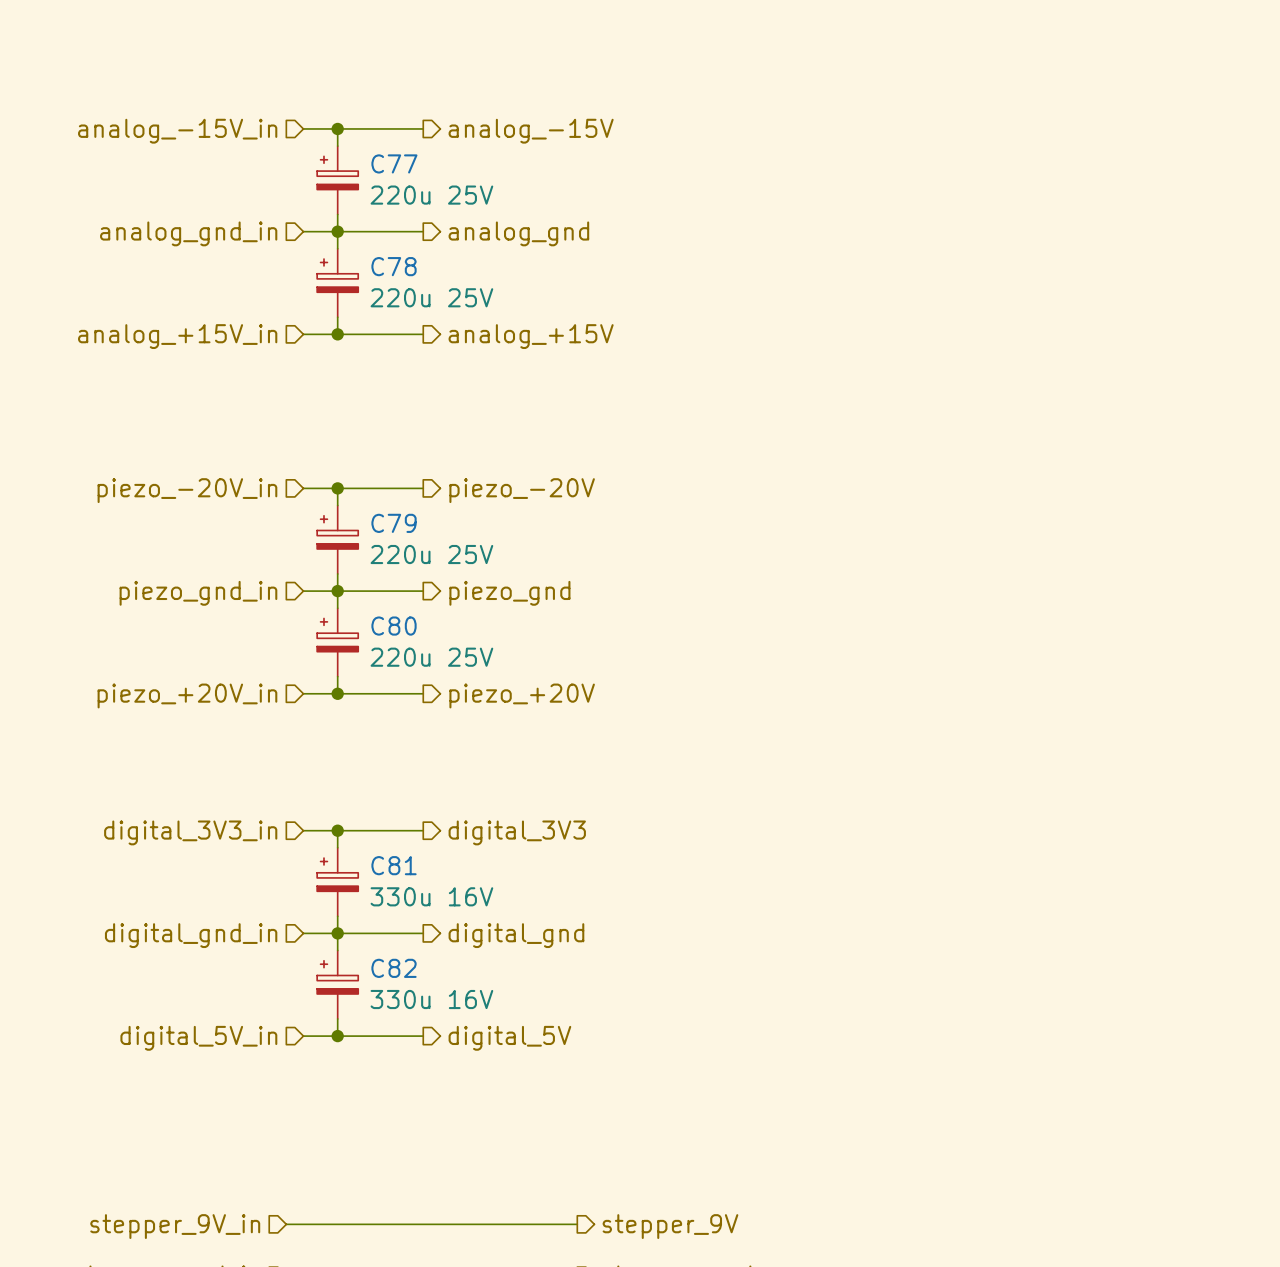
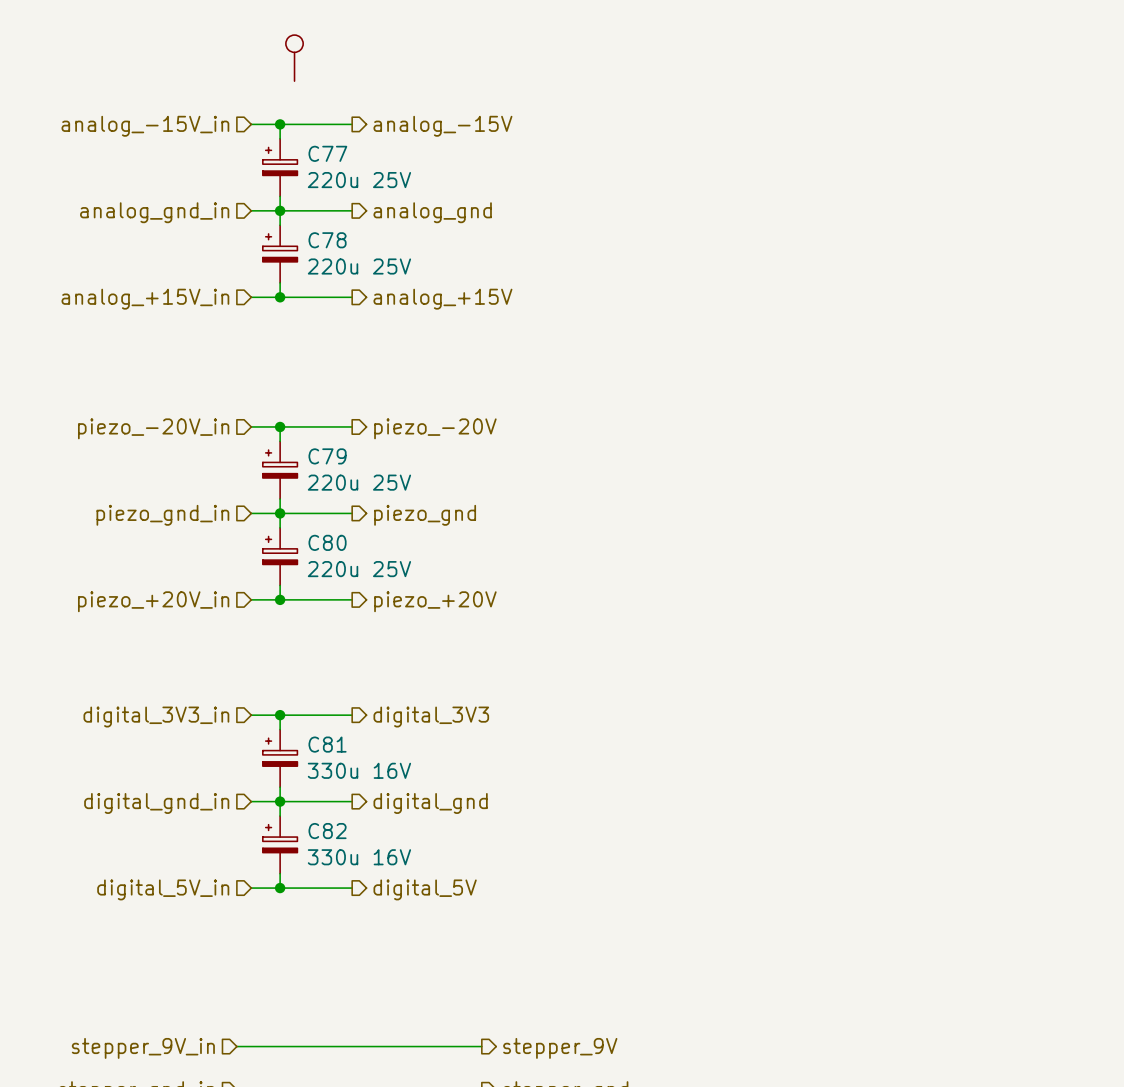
part: none -> (294, 58)

